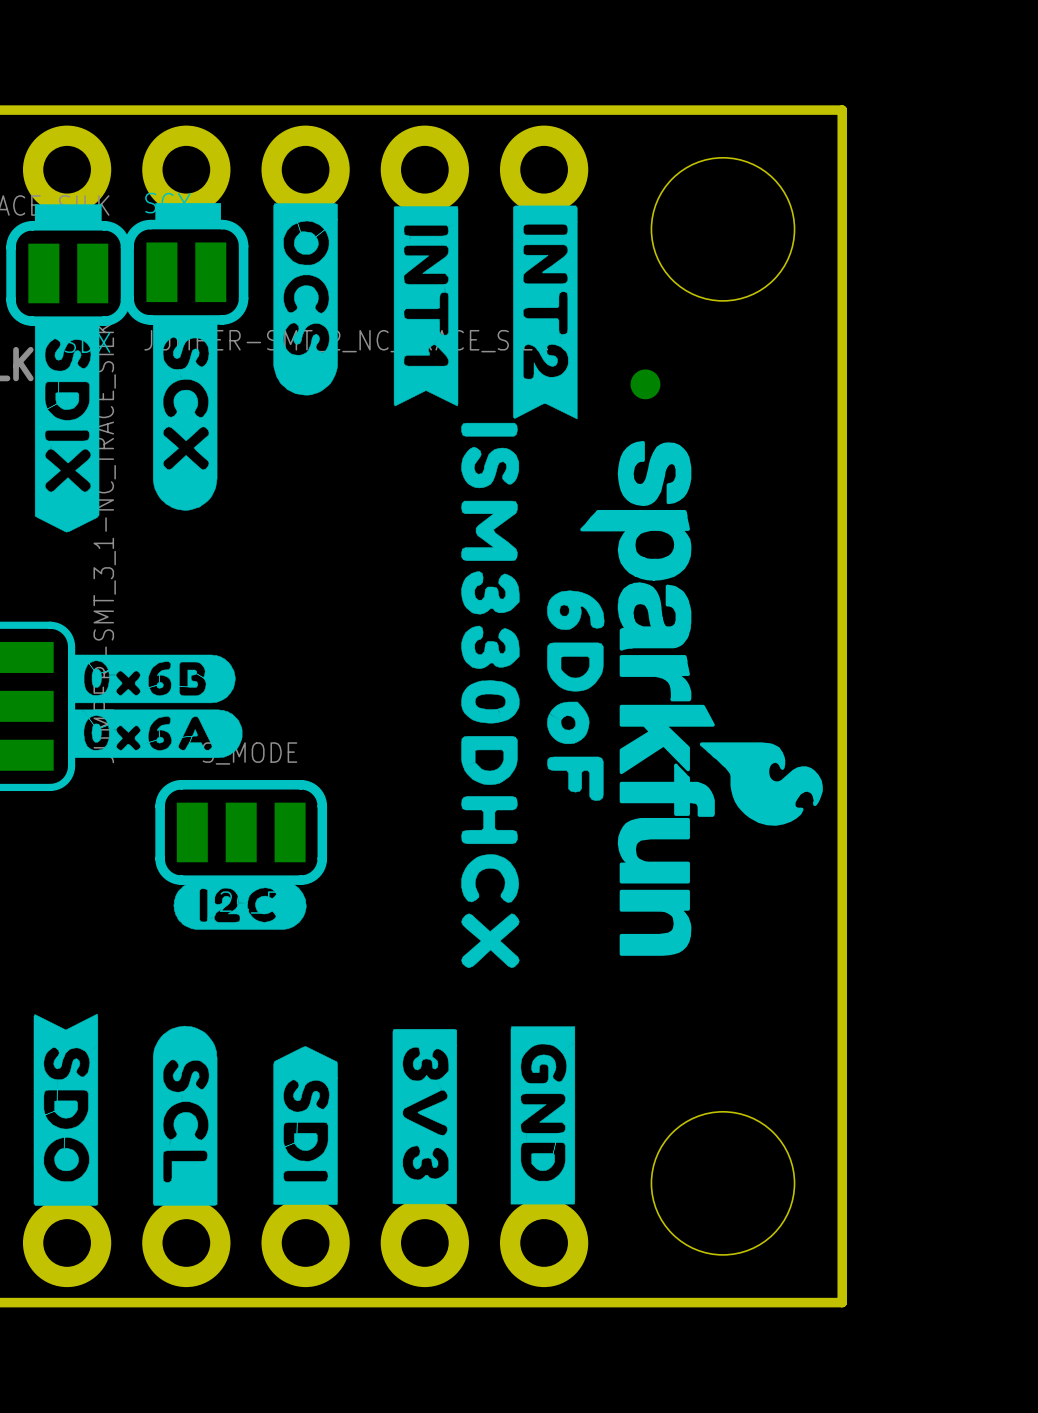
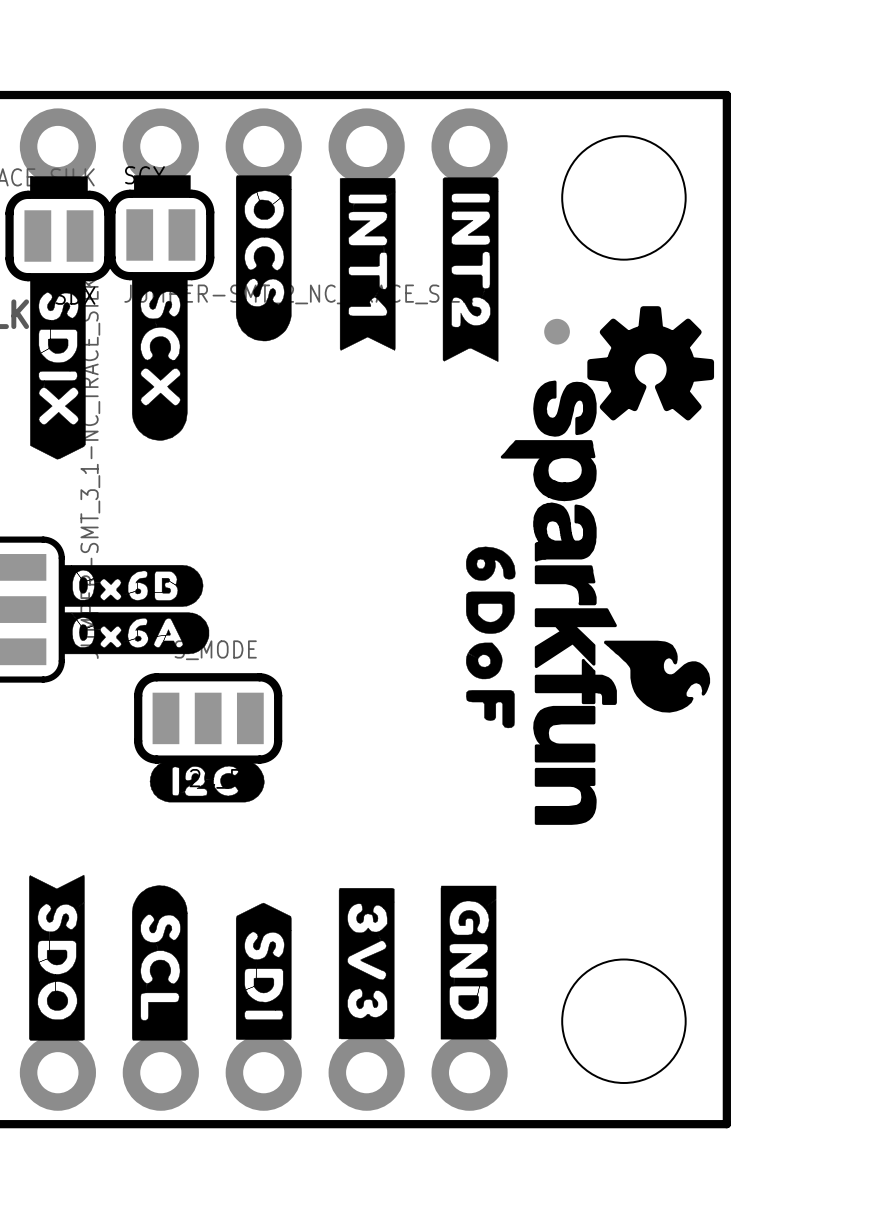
drawing: none -> [587, 306, 715, 421]
drawing: [461, 422, 520, 968] -> none
drawing position: (575, 695) -> (490, 637)

